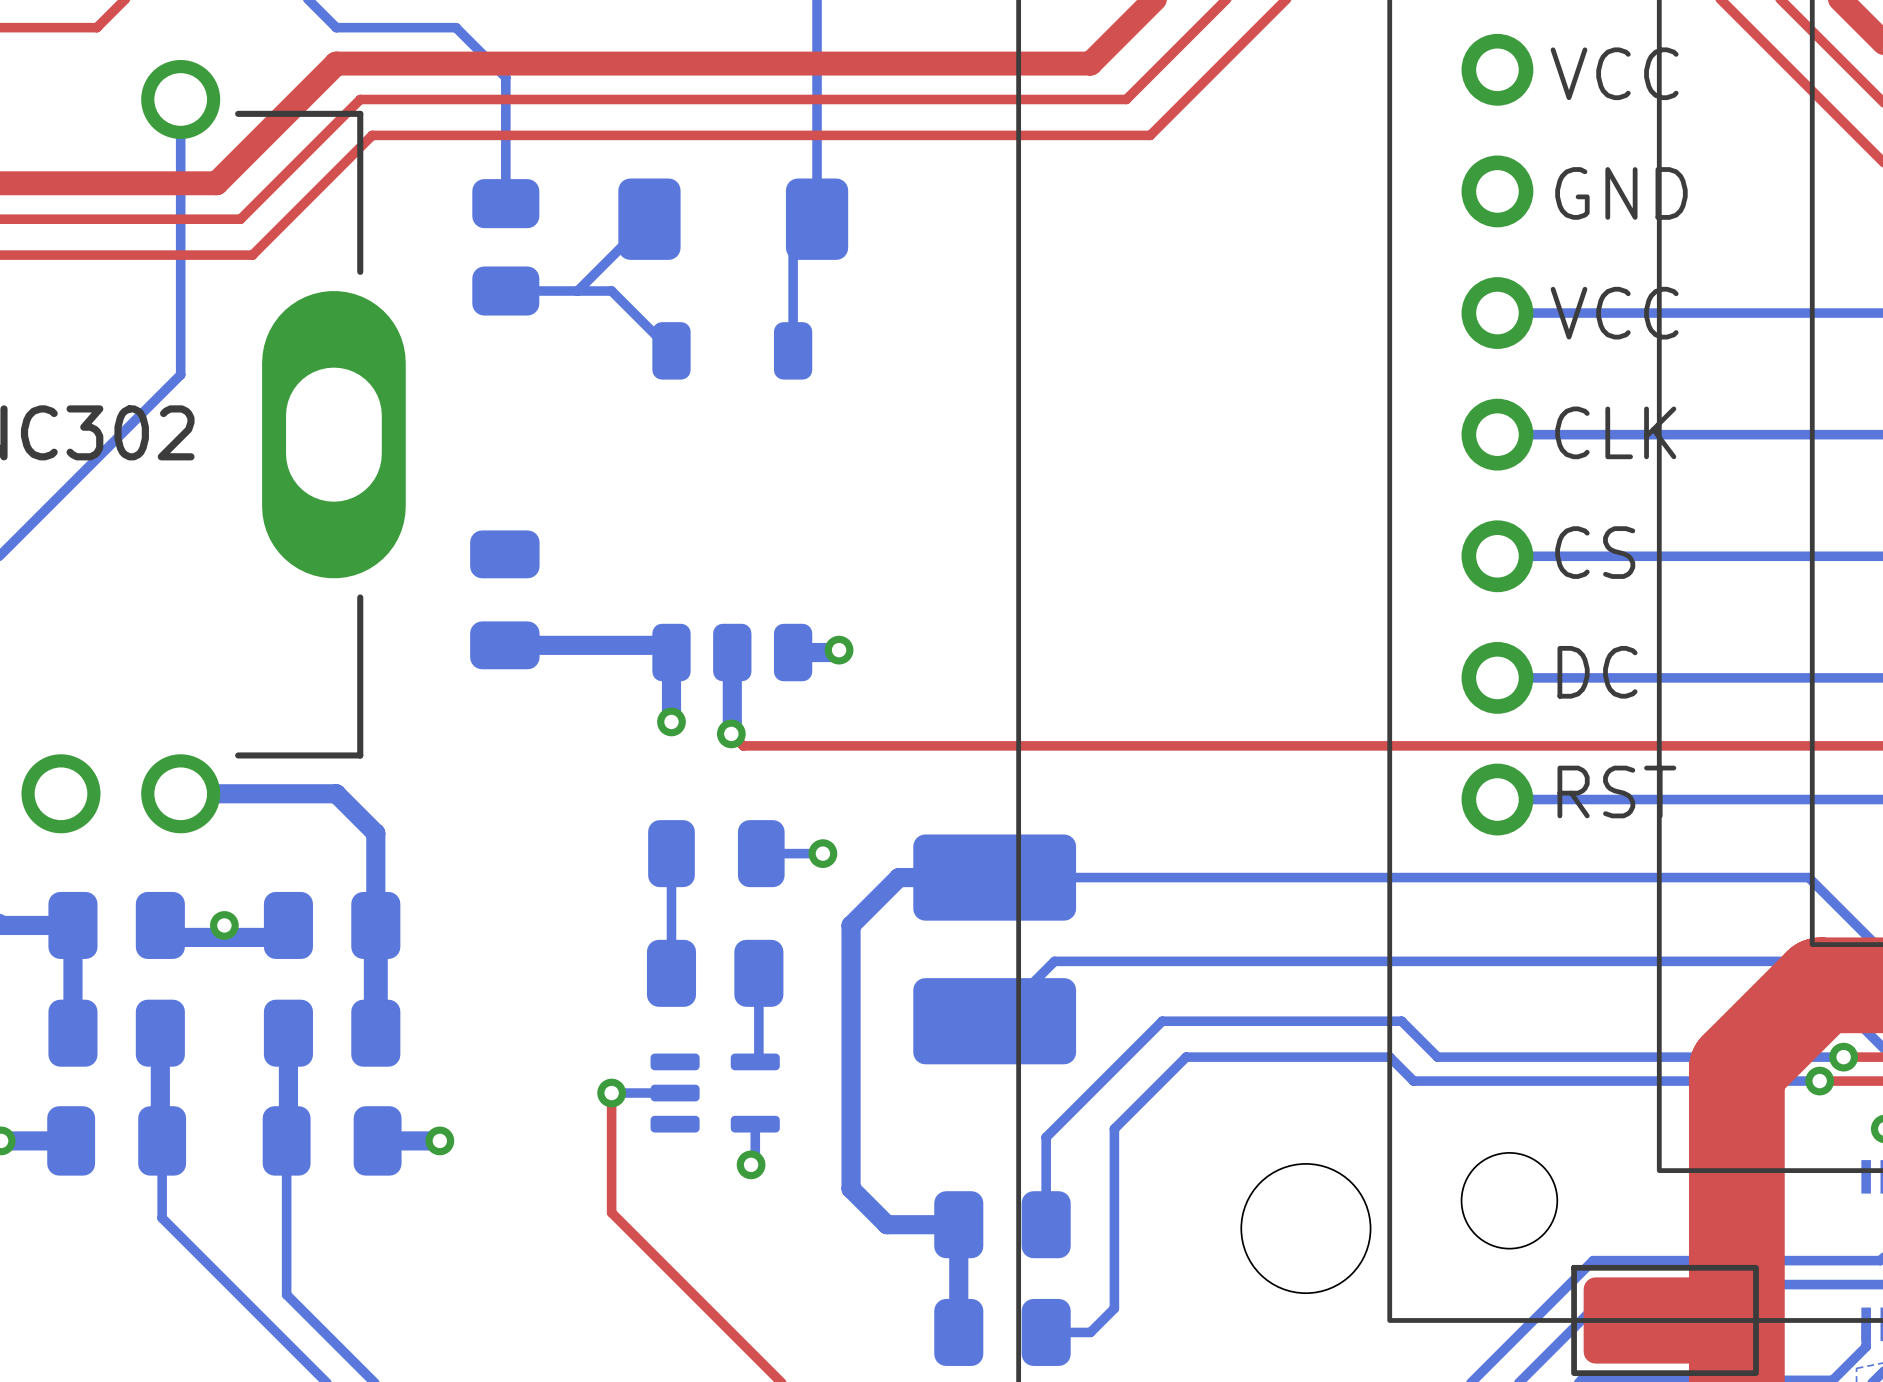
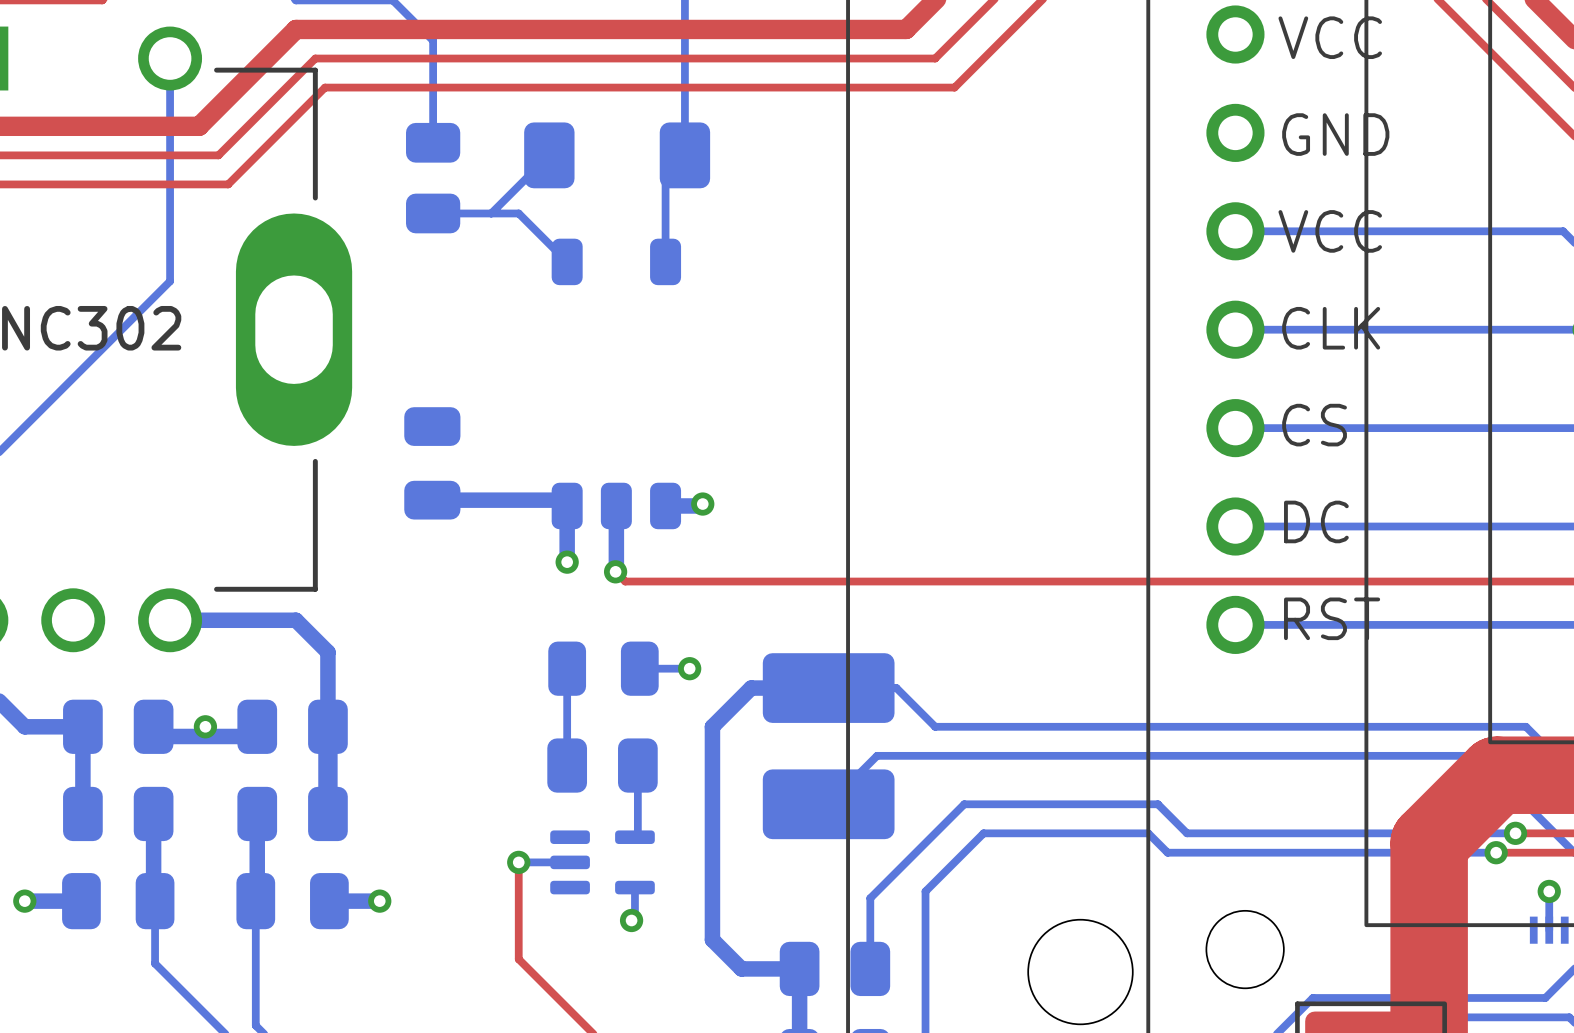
bottom track: (1078, 877) (1808, 877) (1856, 925) -> (896, 688) (935, 726) (1526, 726)

